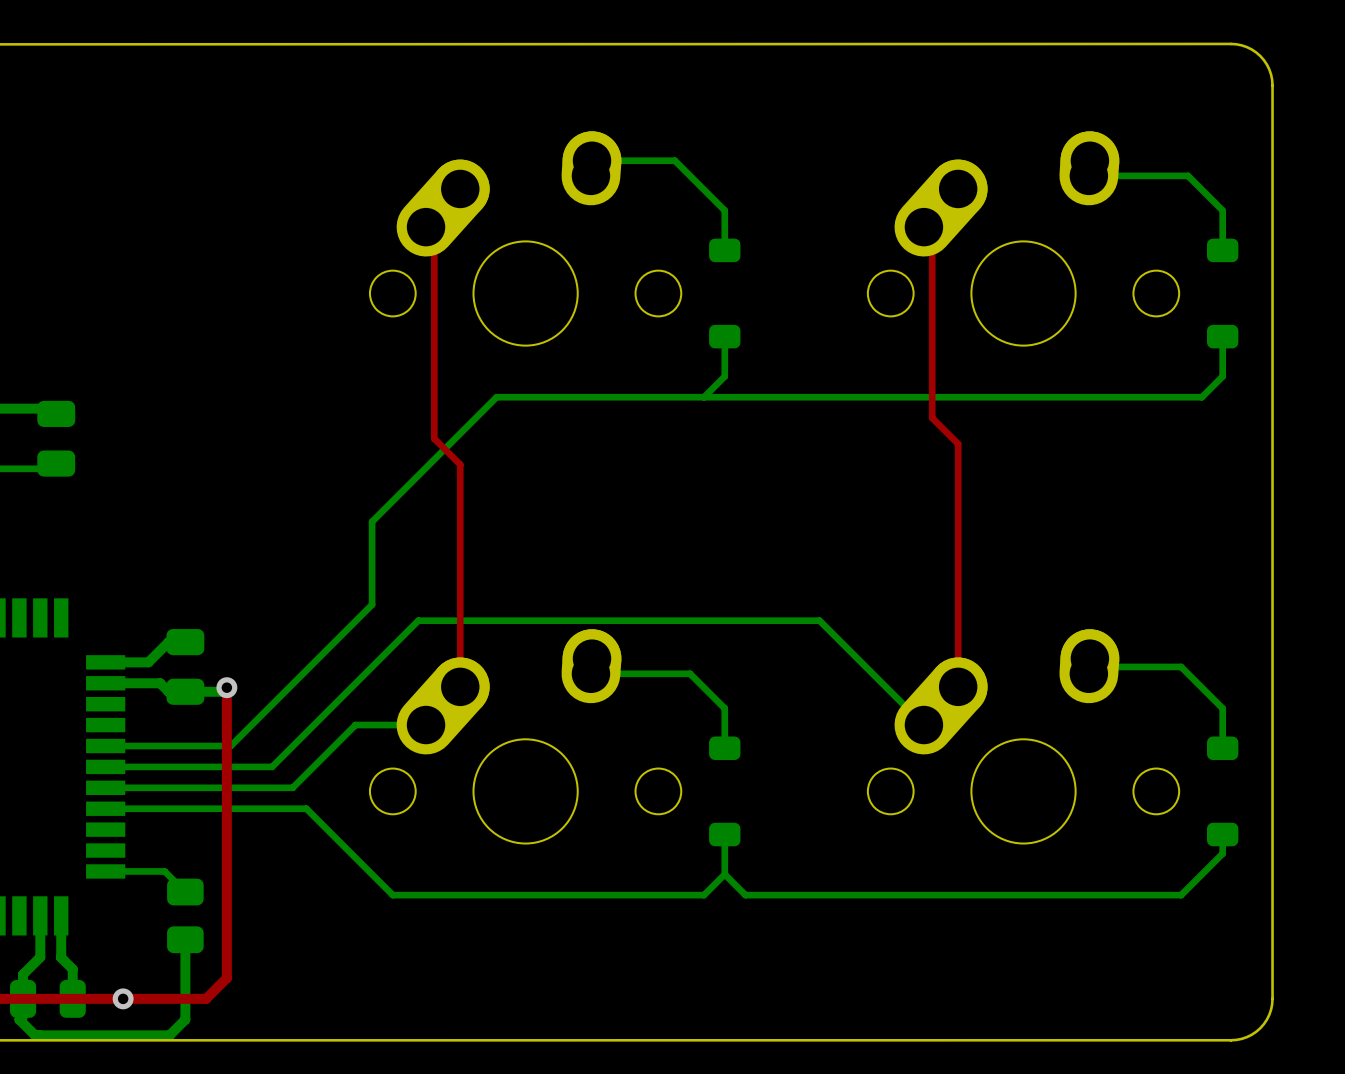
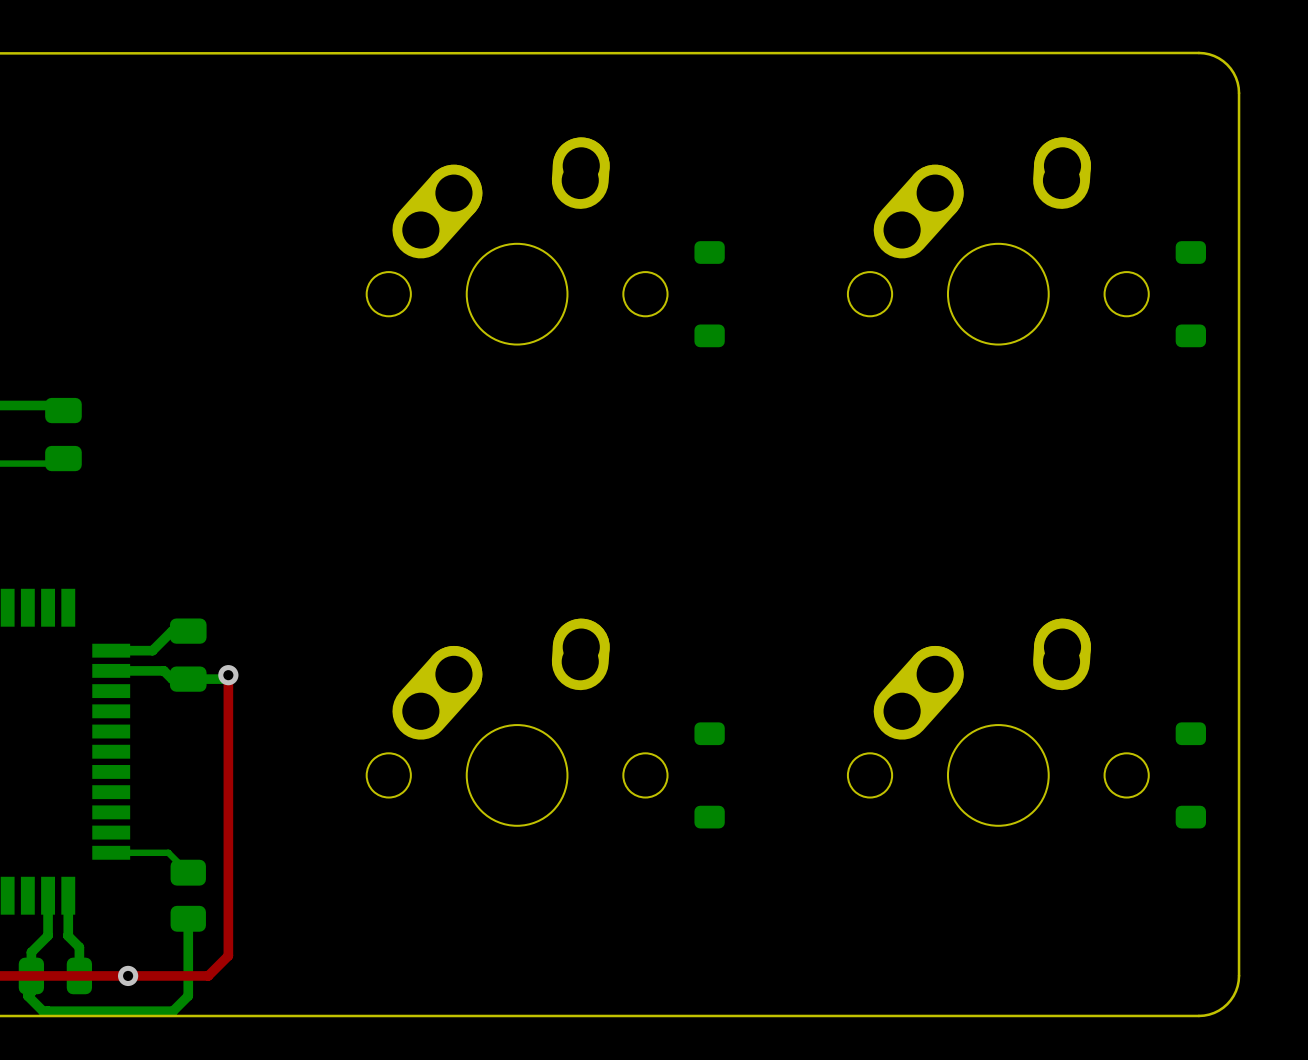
bottom track: (592, 160) (674, 160) (724, 210) (724, 250) -> none
bottom track: (1088, 175) (1188, 175) (1222, 210) (1222, 250) -> none
top track: (426, 227) (434, 235) (434, 438) (460, 464) (460, 686) -> none
top track: (923, 227) (932, 235) (932, 417) (958, 443) (958, 686) -> none
bottom track: (724, 336) (724, 376) (704, 397) -> none
bottom track: (1222, 336) (1222, 376) (1201, 397) (496, 397) (372, 521) (372, 604) (230, 746) (105, 746) -> none
bottom track: (590, 673) (690, 673) (724, 708) (724, 748) -> none
bottom track: (1088, 673) (1095, 666) (1181, 666) (1222, 708) (1222, 748) -> none
bottom track: (426, 725) (355, 725) (292, 787) (105, 787) -> none
bottom track: (923, 725) (819, 620) (418, 620) (272, 766) (105, 766) -> none
bottom track: (105, 808) (306, 808) (392, 895) (704, 895) (724, 874) -> none
bottom track: (724, 834) (724, 874) -> none
bottom track: (1222, 834) (1222, 853) (1181, 895) (745, 895) (724, 874) -> none

